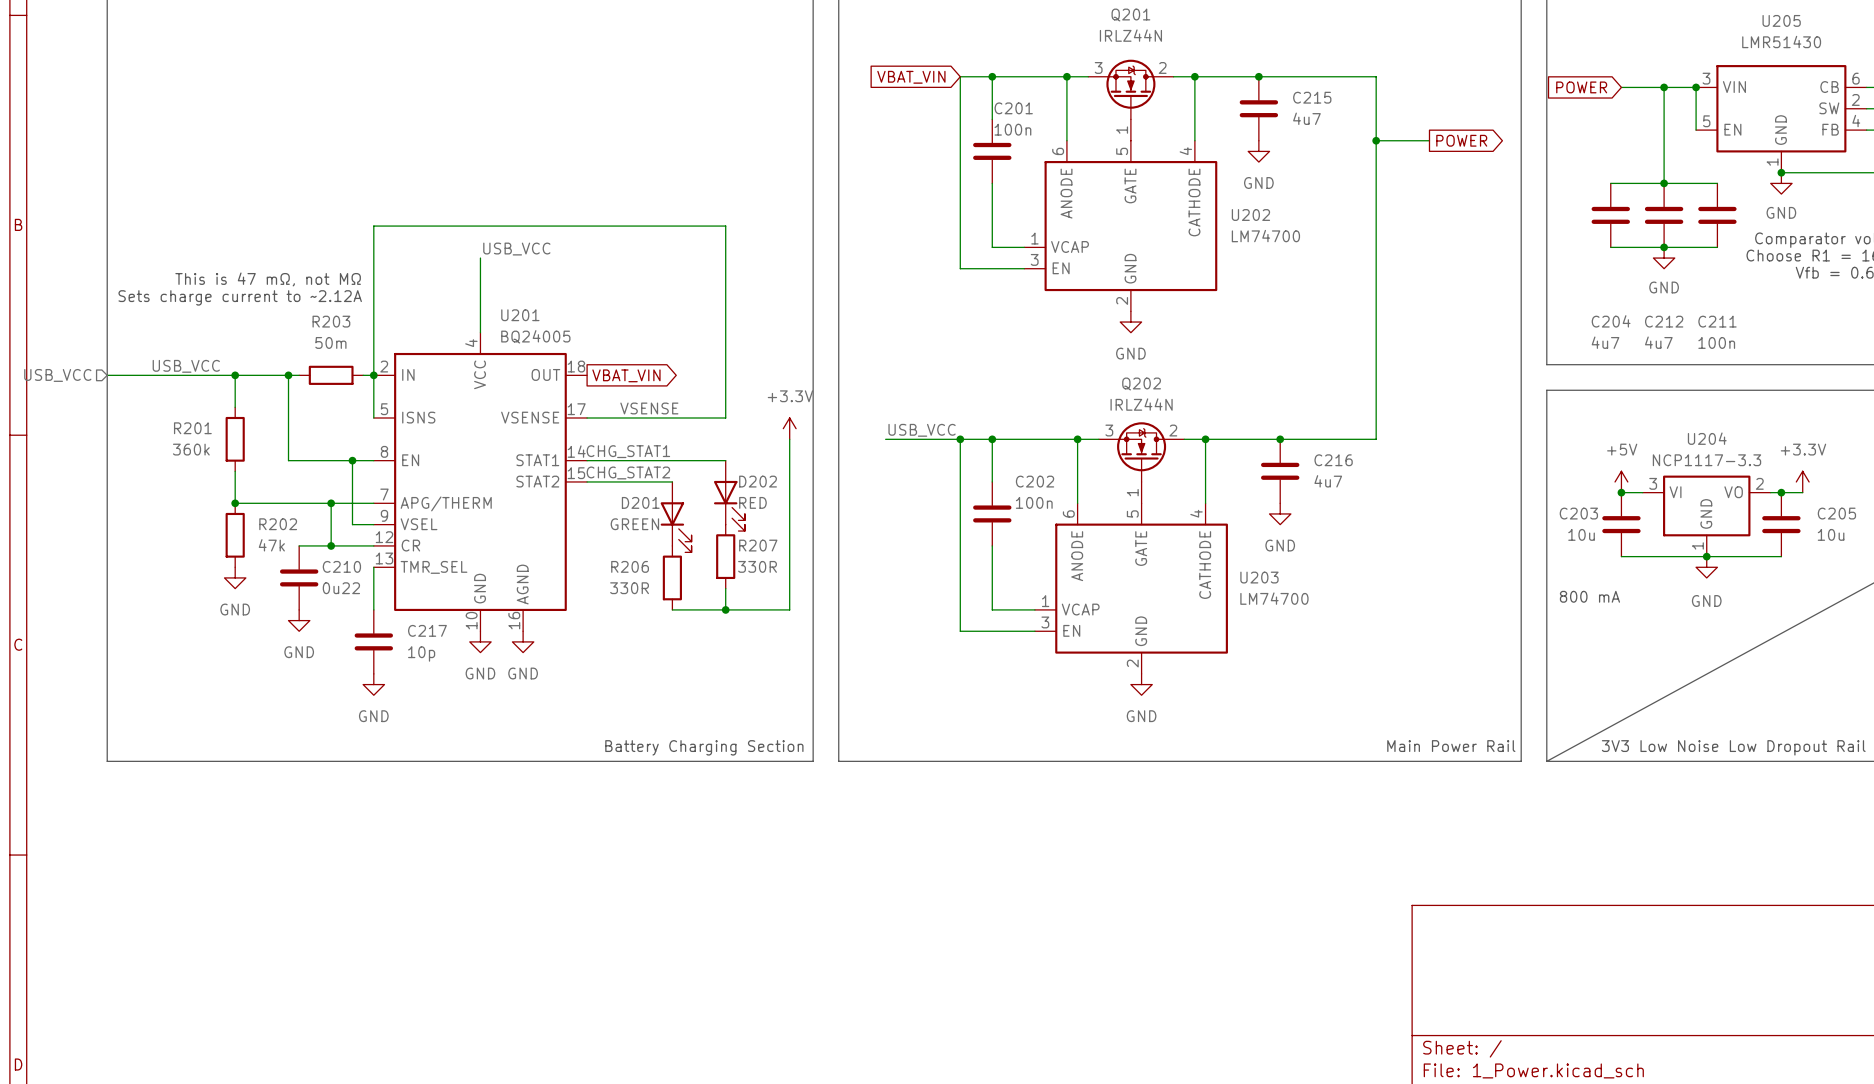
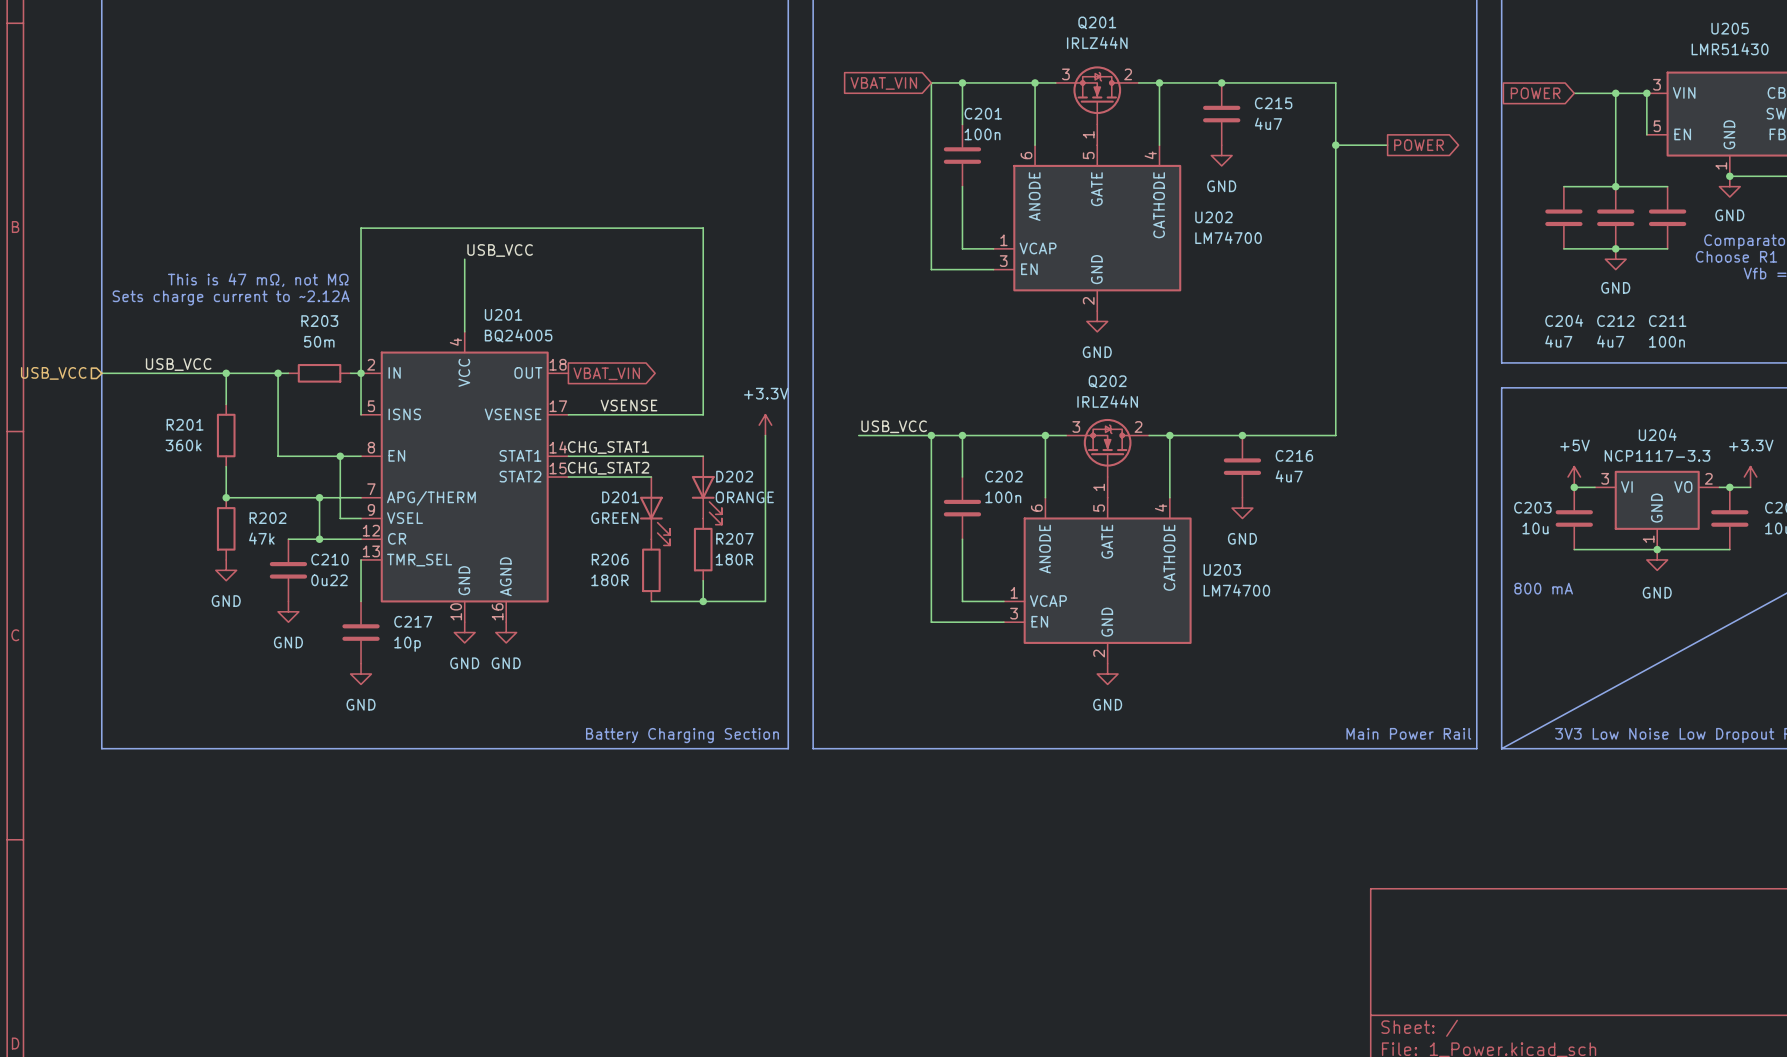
D202 value: RED (752, 502) -> ORANGE (744, 497)
R207 value: 330R (757, 566) -> 180R (734, 559)
R206 value: 330R (629, 588) -> 180R (609, 580)

